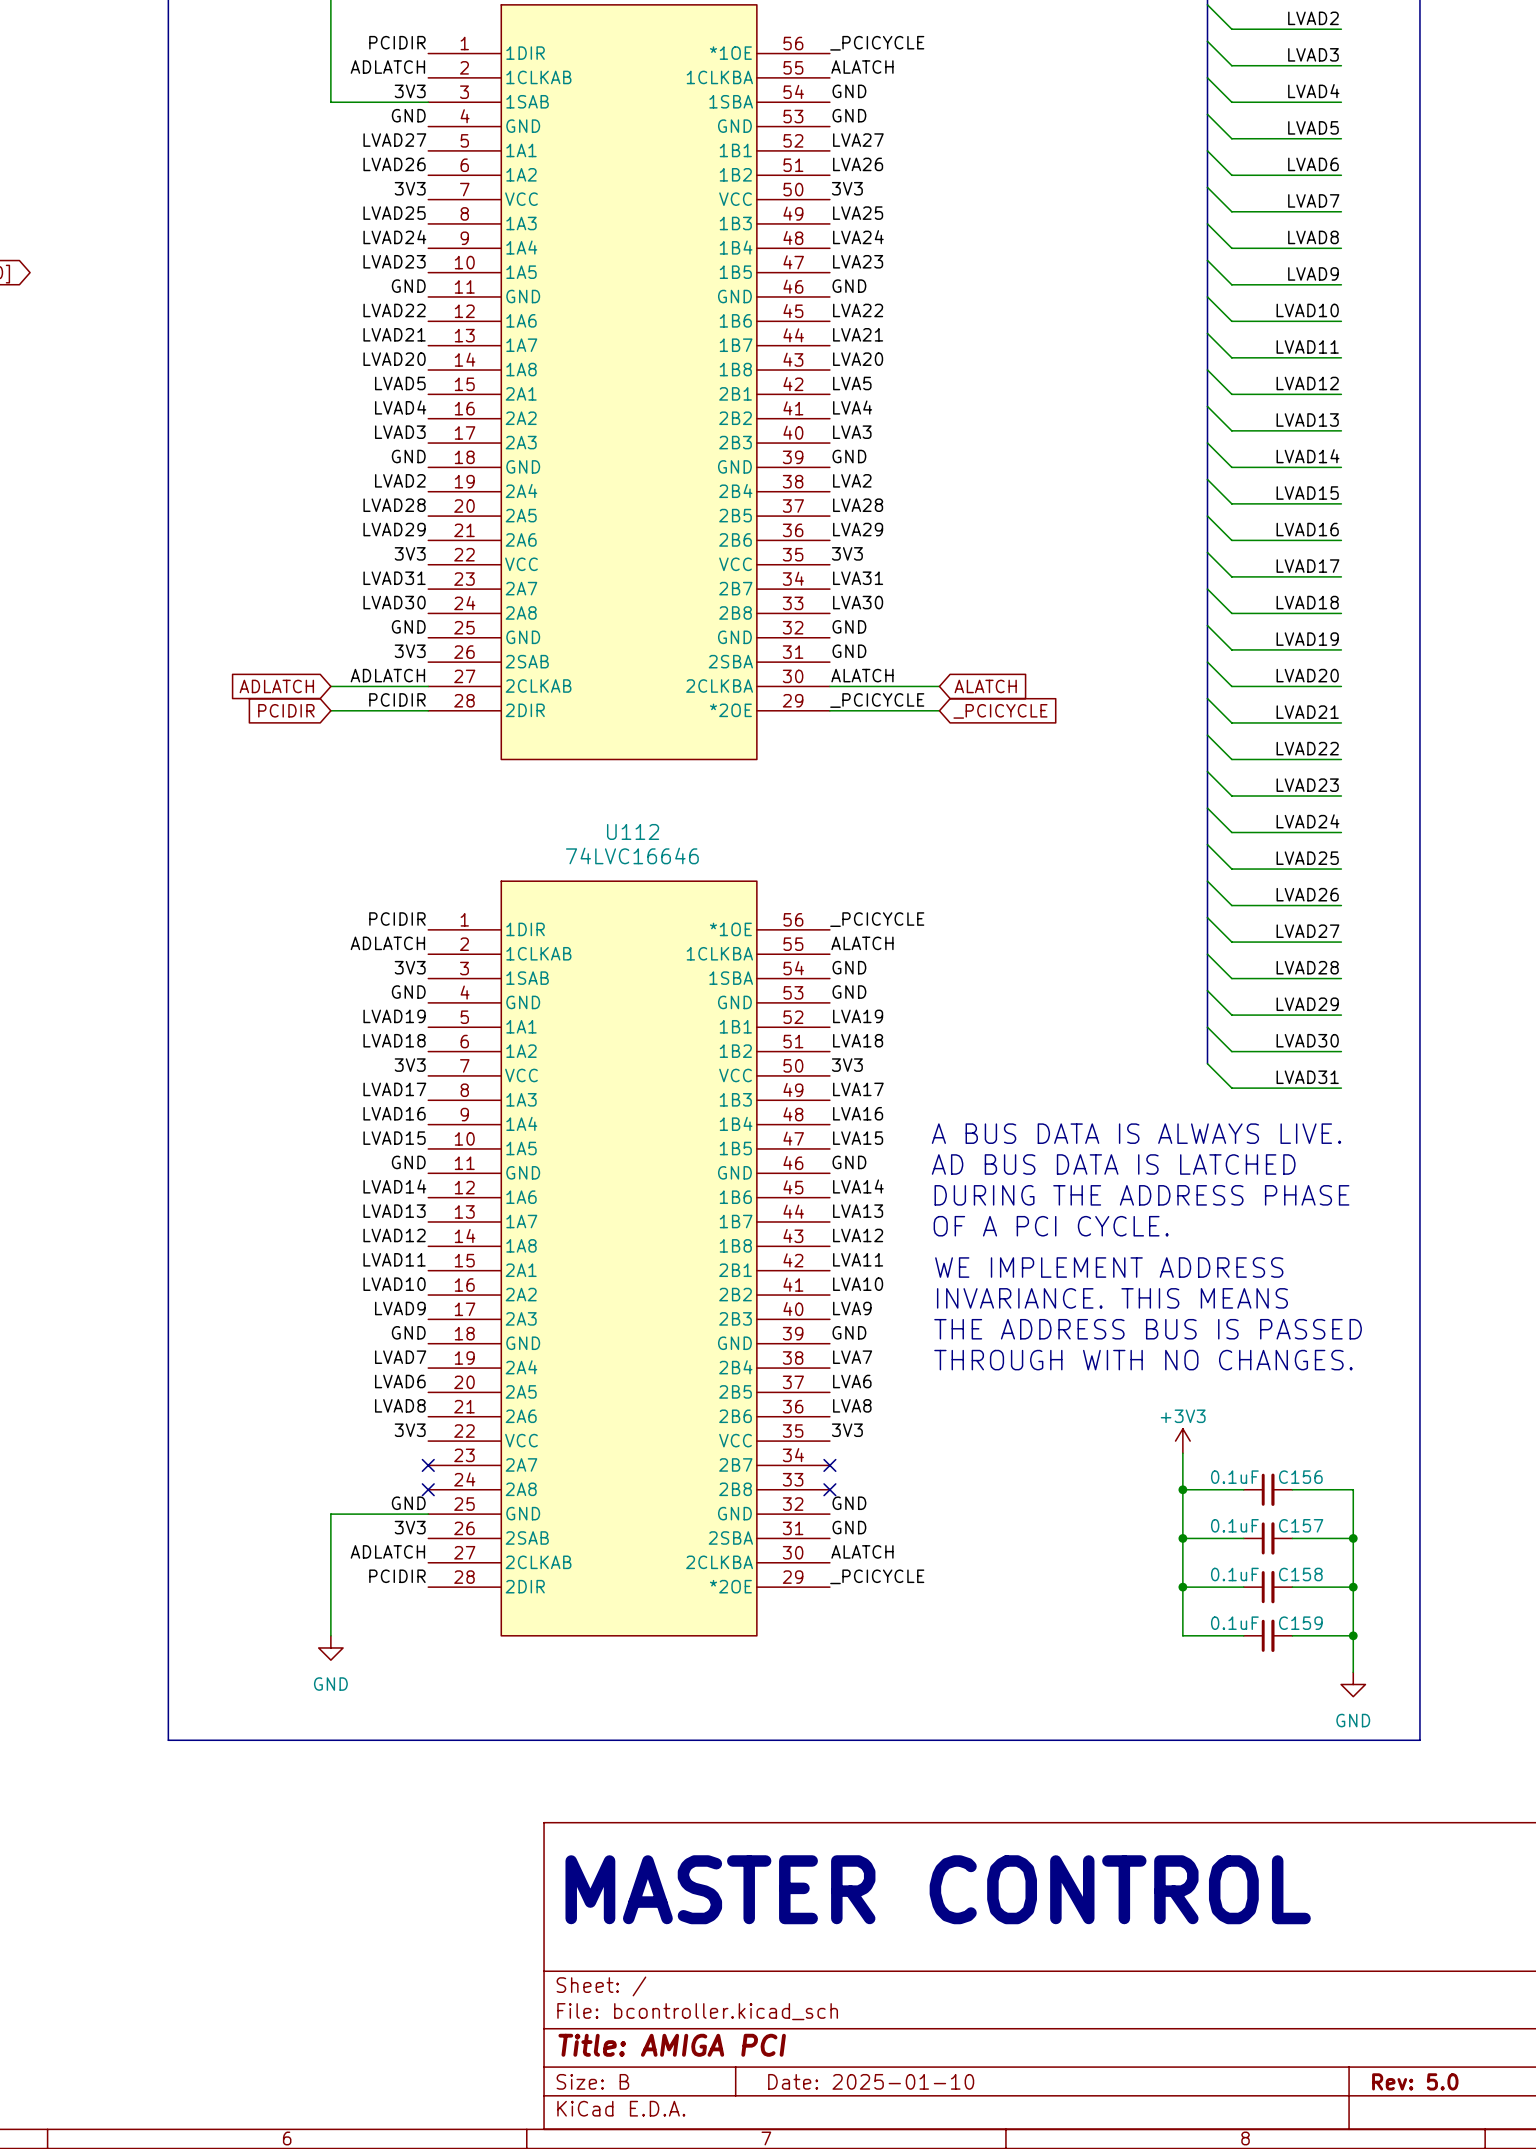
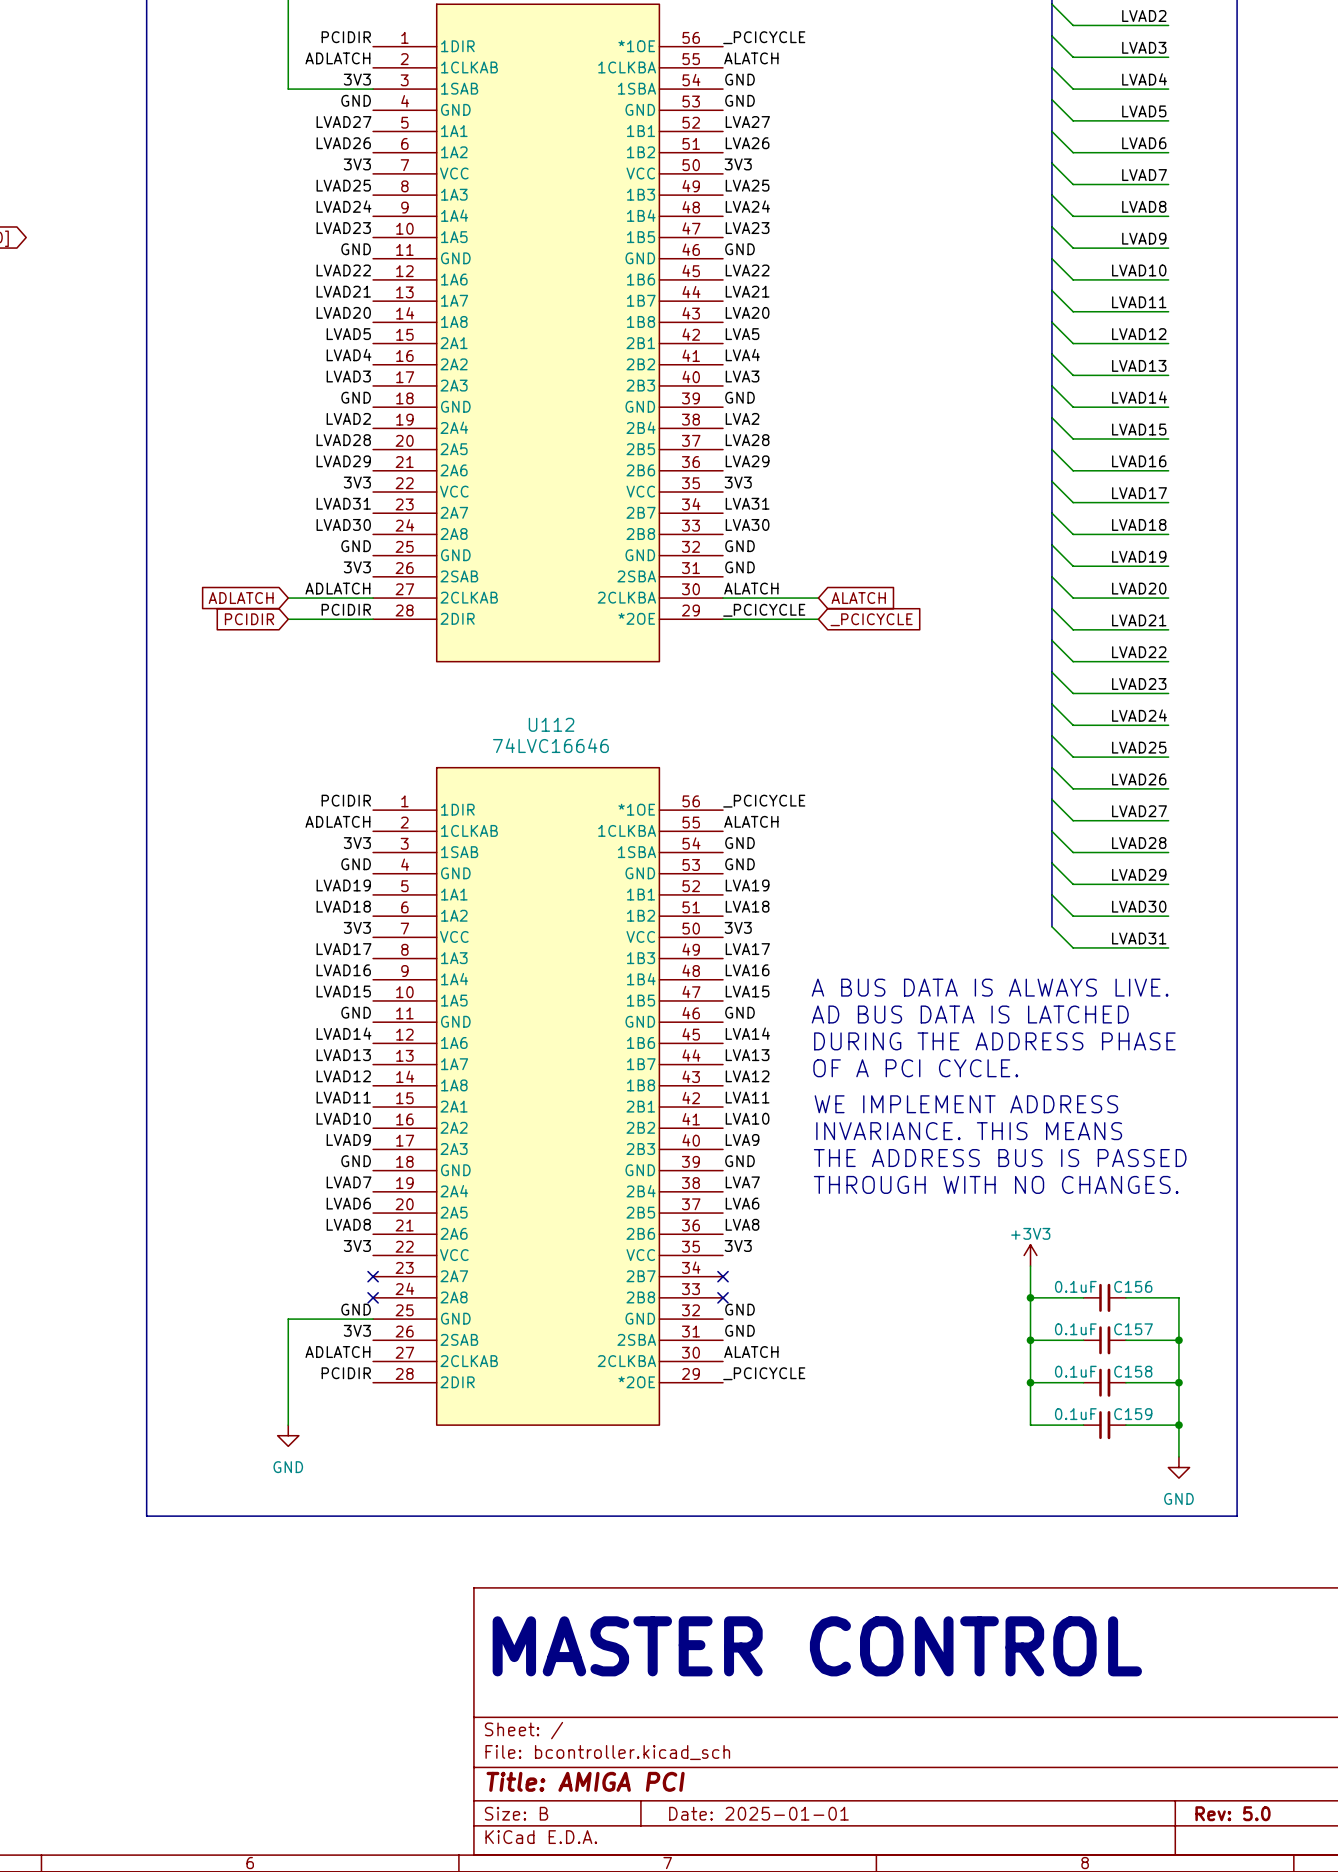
title block: Date: 2025-01-10 (871, 2081) -> Date: 2025-01-01 (758, 1813)

